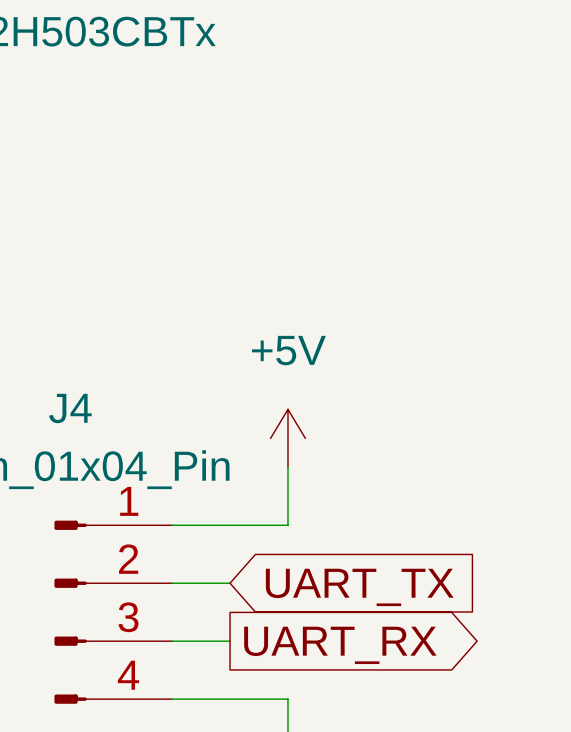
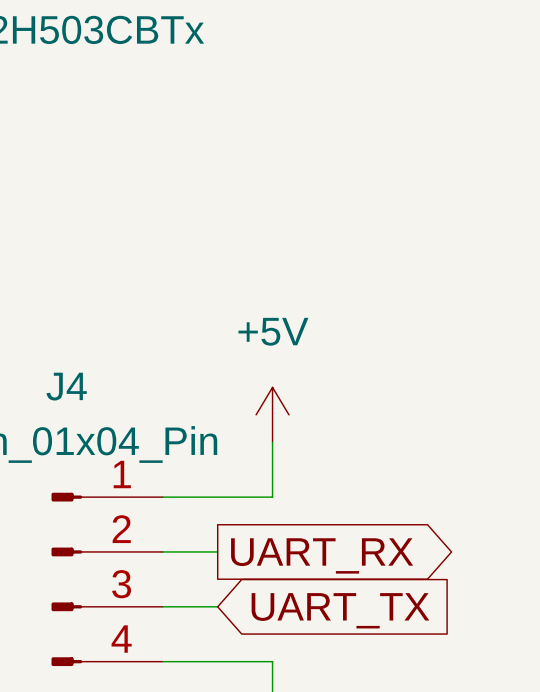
global label shape: input (359, 587) -> output (322, 555)
global label: UART_TX (359, 587) -> UART_RX (322, 555)
global label shape: output (340, 645) -> input (340, 610)
global label: UART_RX (340, 645) -> UART_TX (340, 610)

